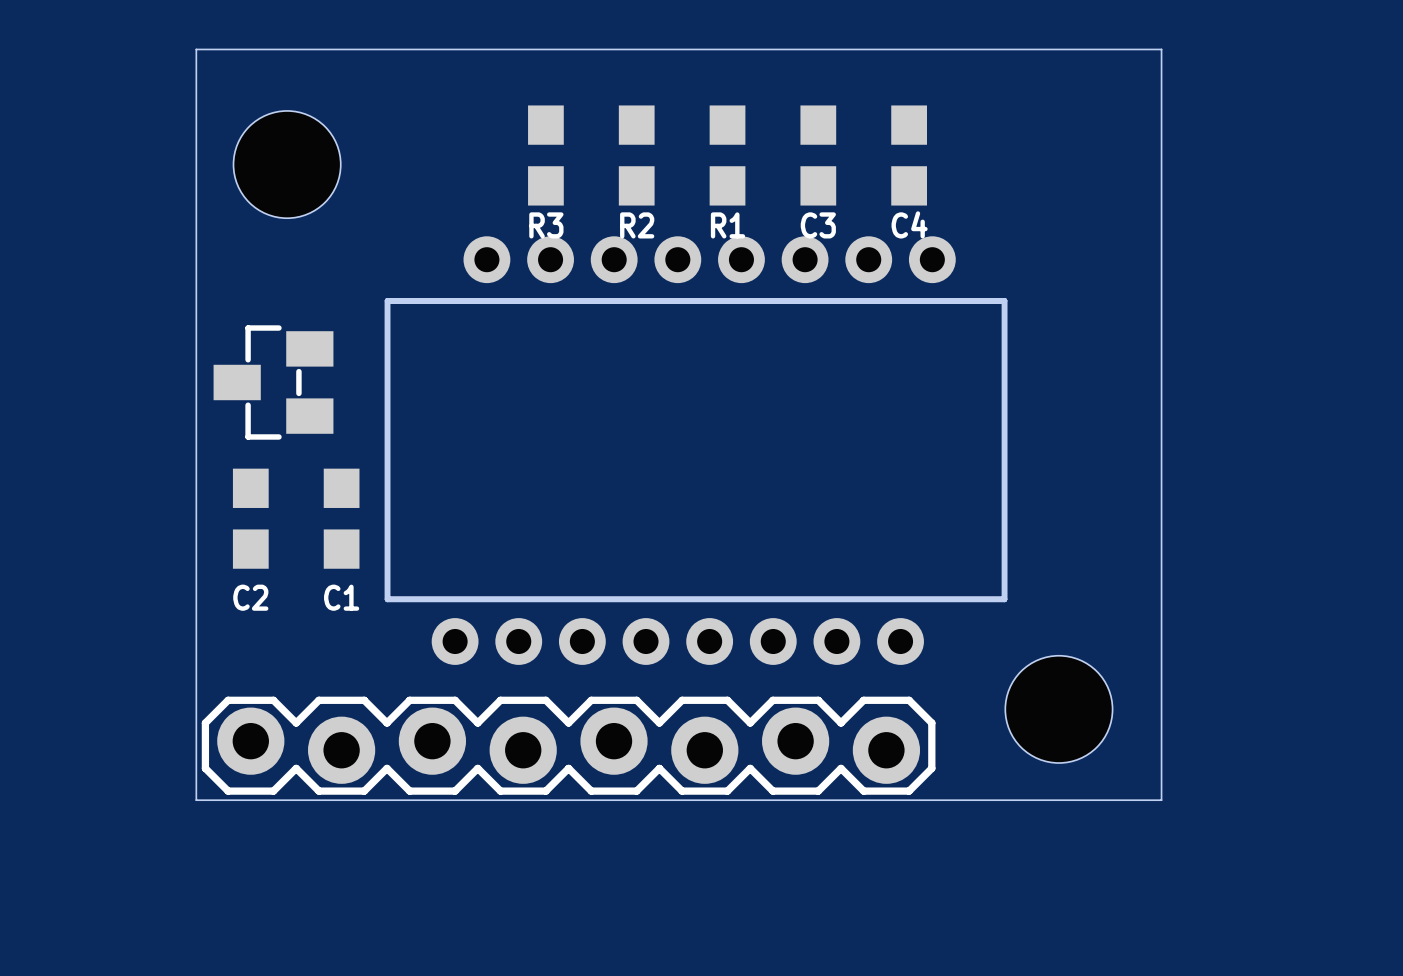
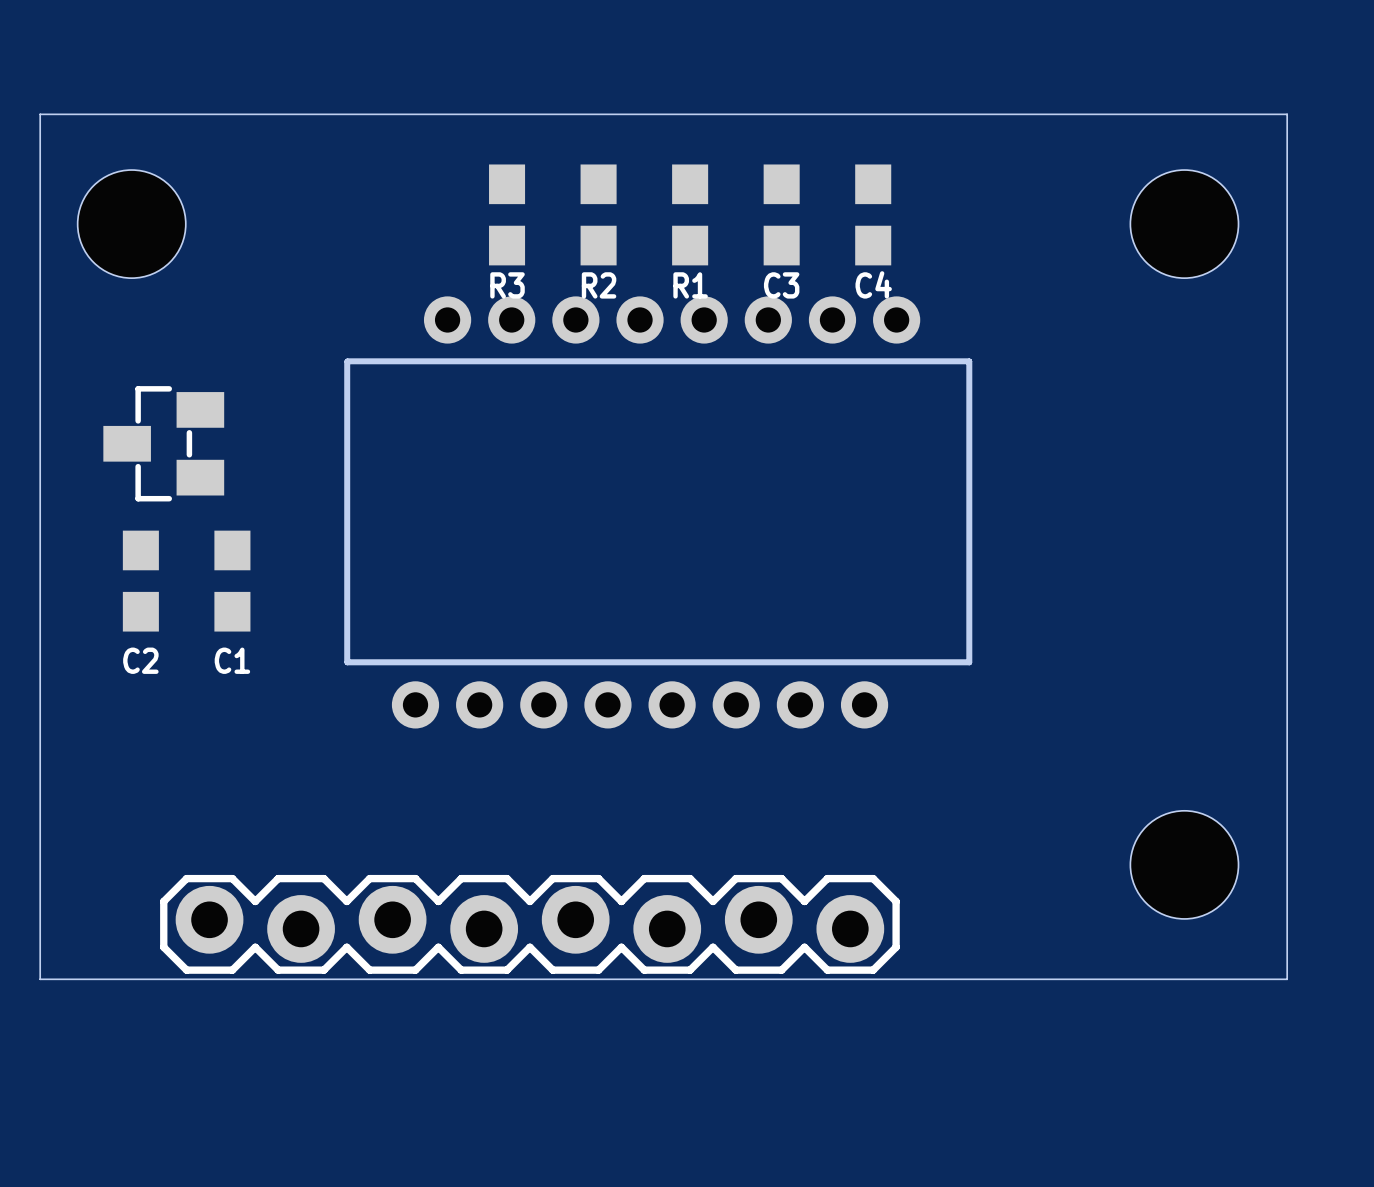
board edge: (196, 49) (1161, 49) (1161, 800) (196, 800) (196, 49) -> (40, 114) (40, 979) (1287, 979) (1287, 114) (40, 114)
hole position: (287, 164) -> (131, 224)
hole: none -> (1184, 224)
part position: (273, 382) -> (163, 443)
C2 position: (250, 518) -> (140, 581)
C1 position: (341, 518) -> (232, 581)
hole position: (1058, 709) -> (1184, 864)
part position: (568, 745) -> (529, 924)

